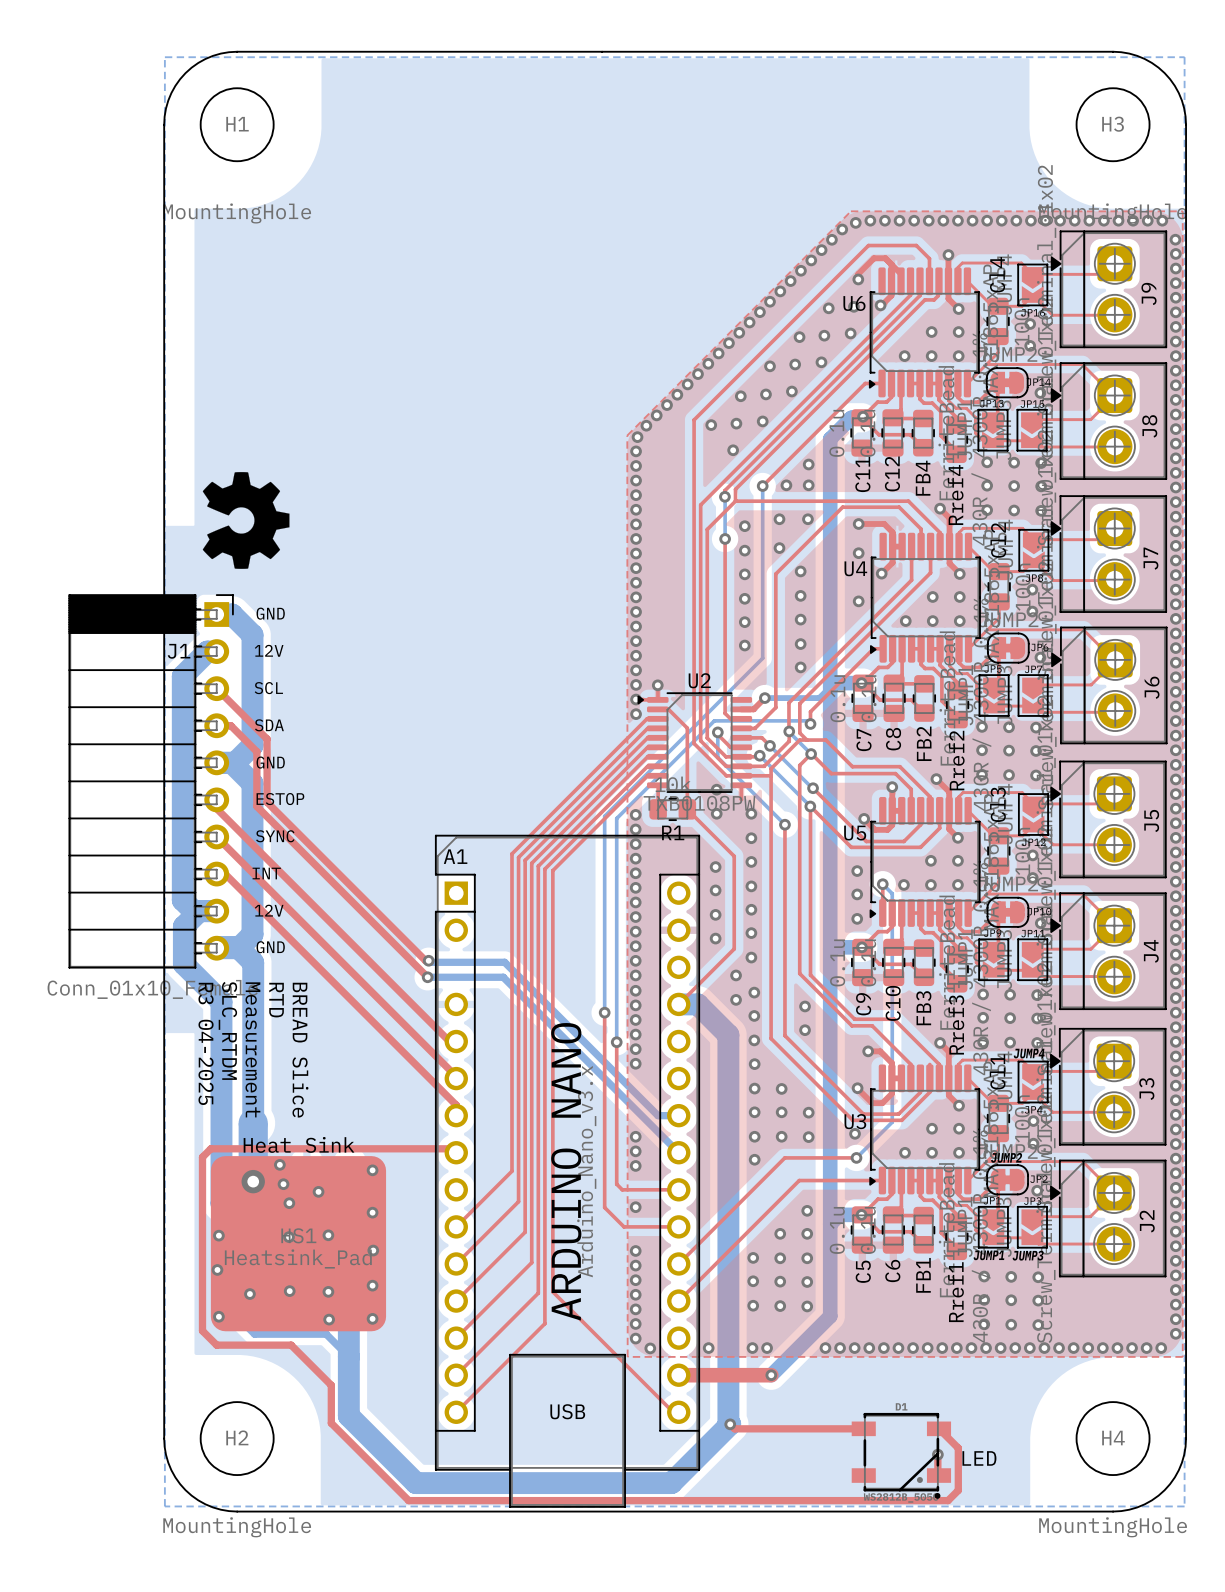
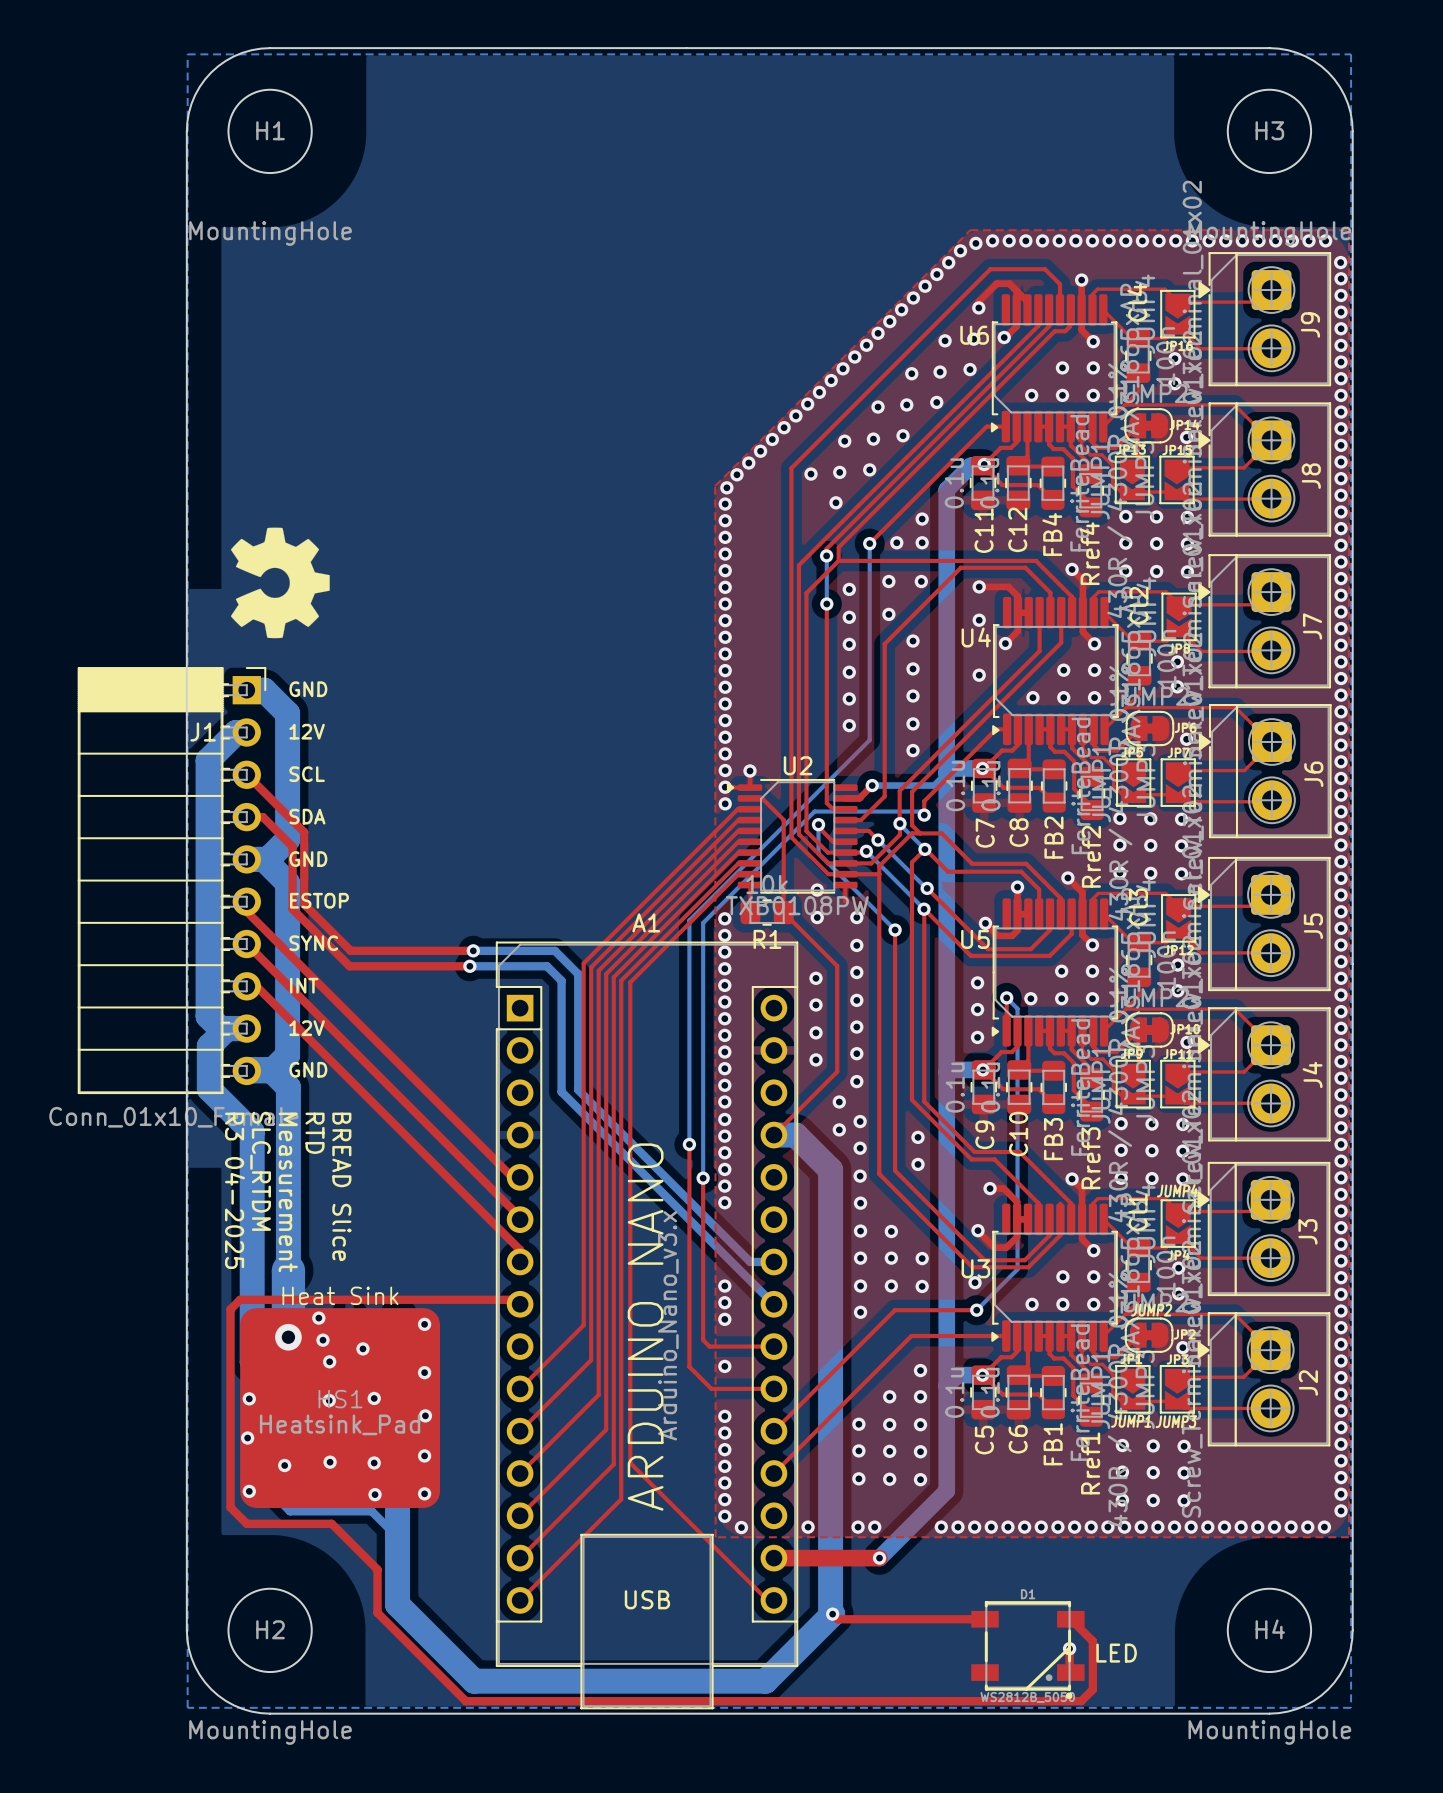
A1 footprint: [434, 834, 701, 1508] -> [495, 941, 799, 1710]
top track: (307, 842) (425, 960) (428, 960) -> (350, 950) (473, 950)
via: none -> (473, 950)
top track: (306, 856) (427, 977) -> (349, 966) (469, 966)
via: none -> (469, 966)
A1 name position: A1 (455, 856) -> A1 (646, 922)
bottom track: (428, 960) (430, 962) (504, 962) (507, 964) -> (473, 950) (554, 950) (578, 974) (578, 1089)
via: (428, 960) -> none
bottom track: (427, 977) (503, 977) -> (469, 966) (547, 966) (561, 980) (561, 1091) (573, 1104)
via: (427, 977) -> none

